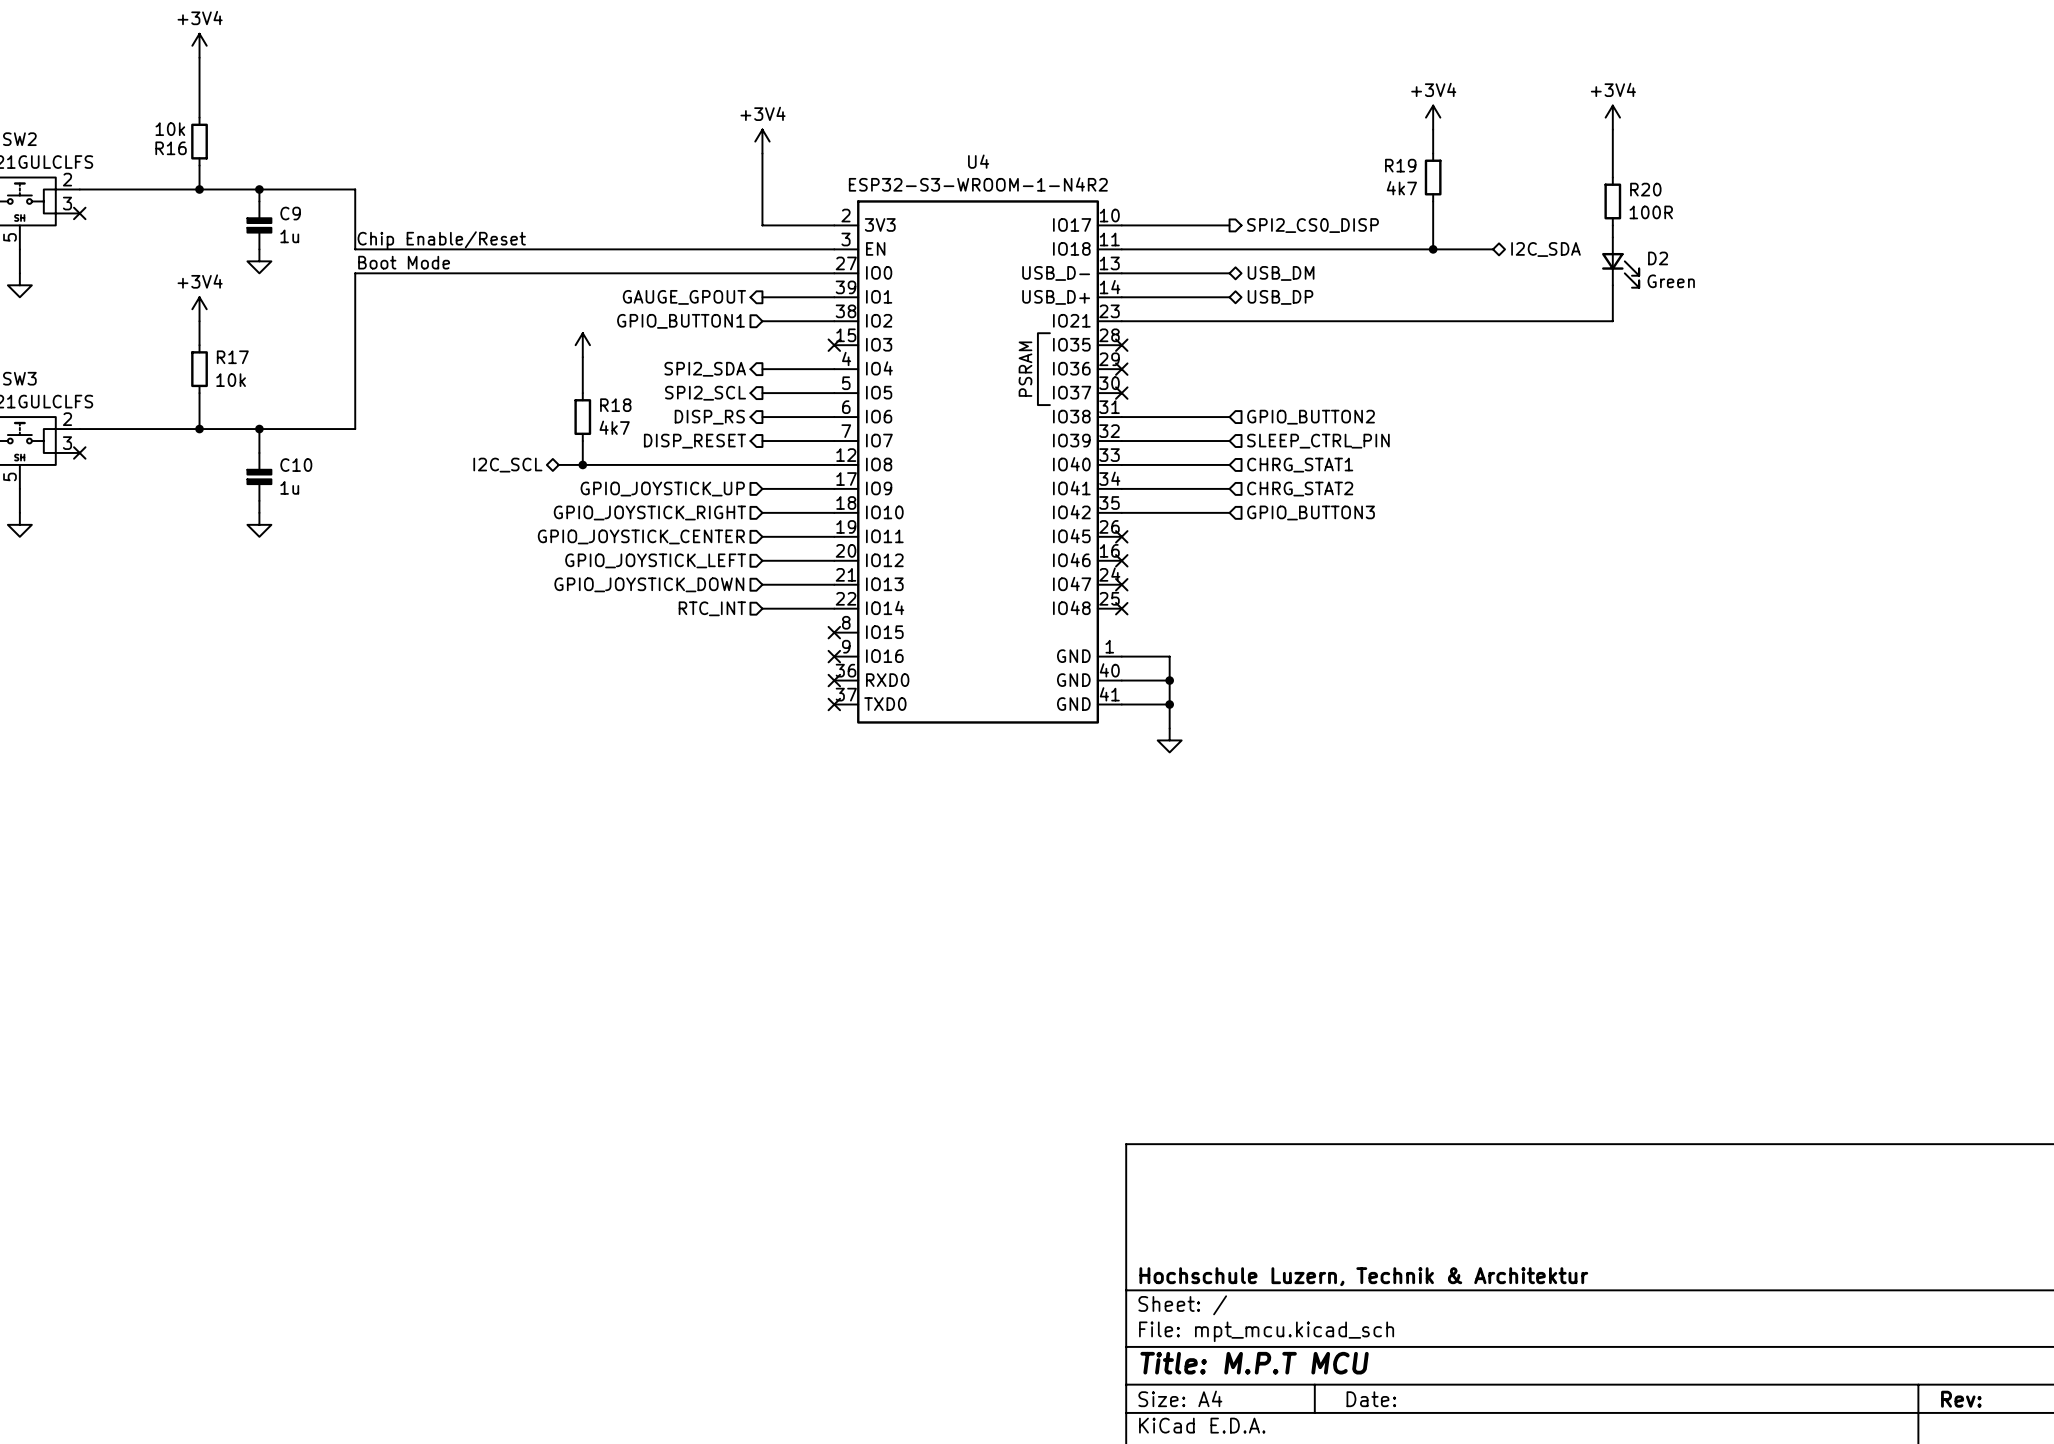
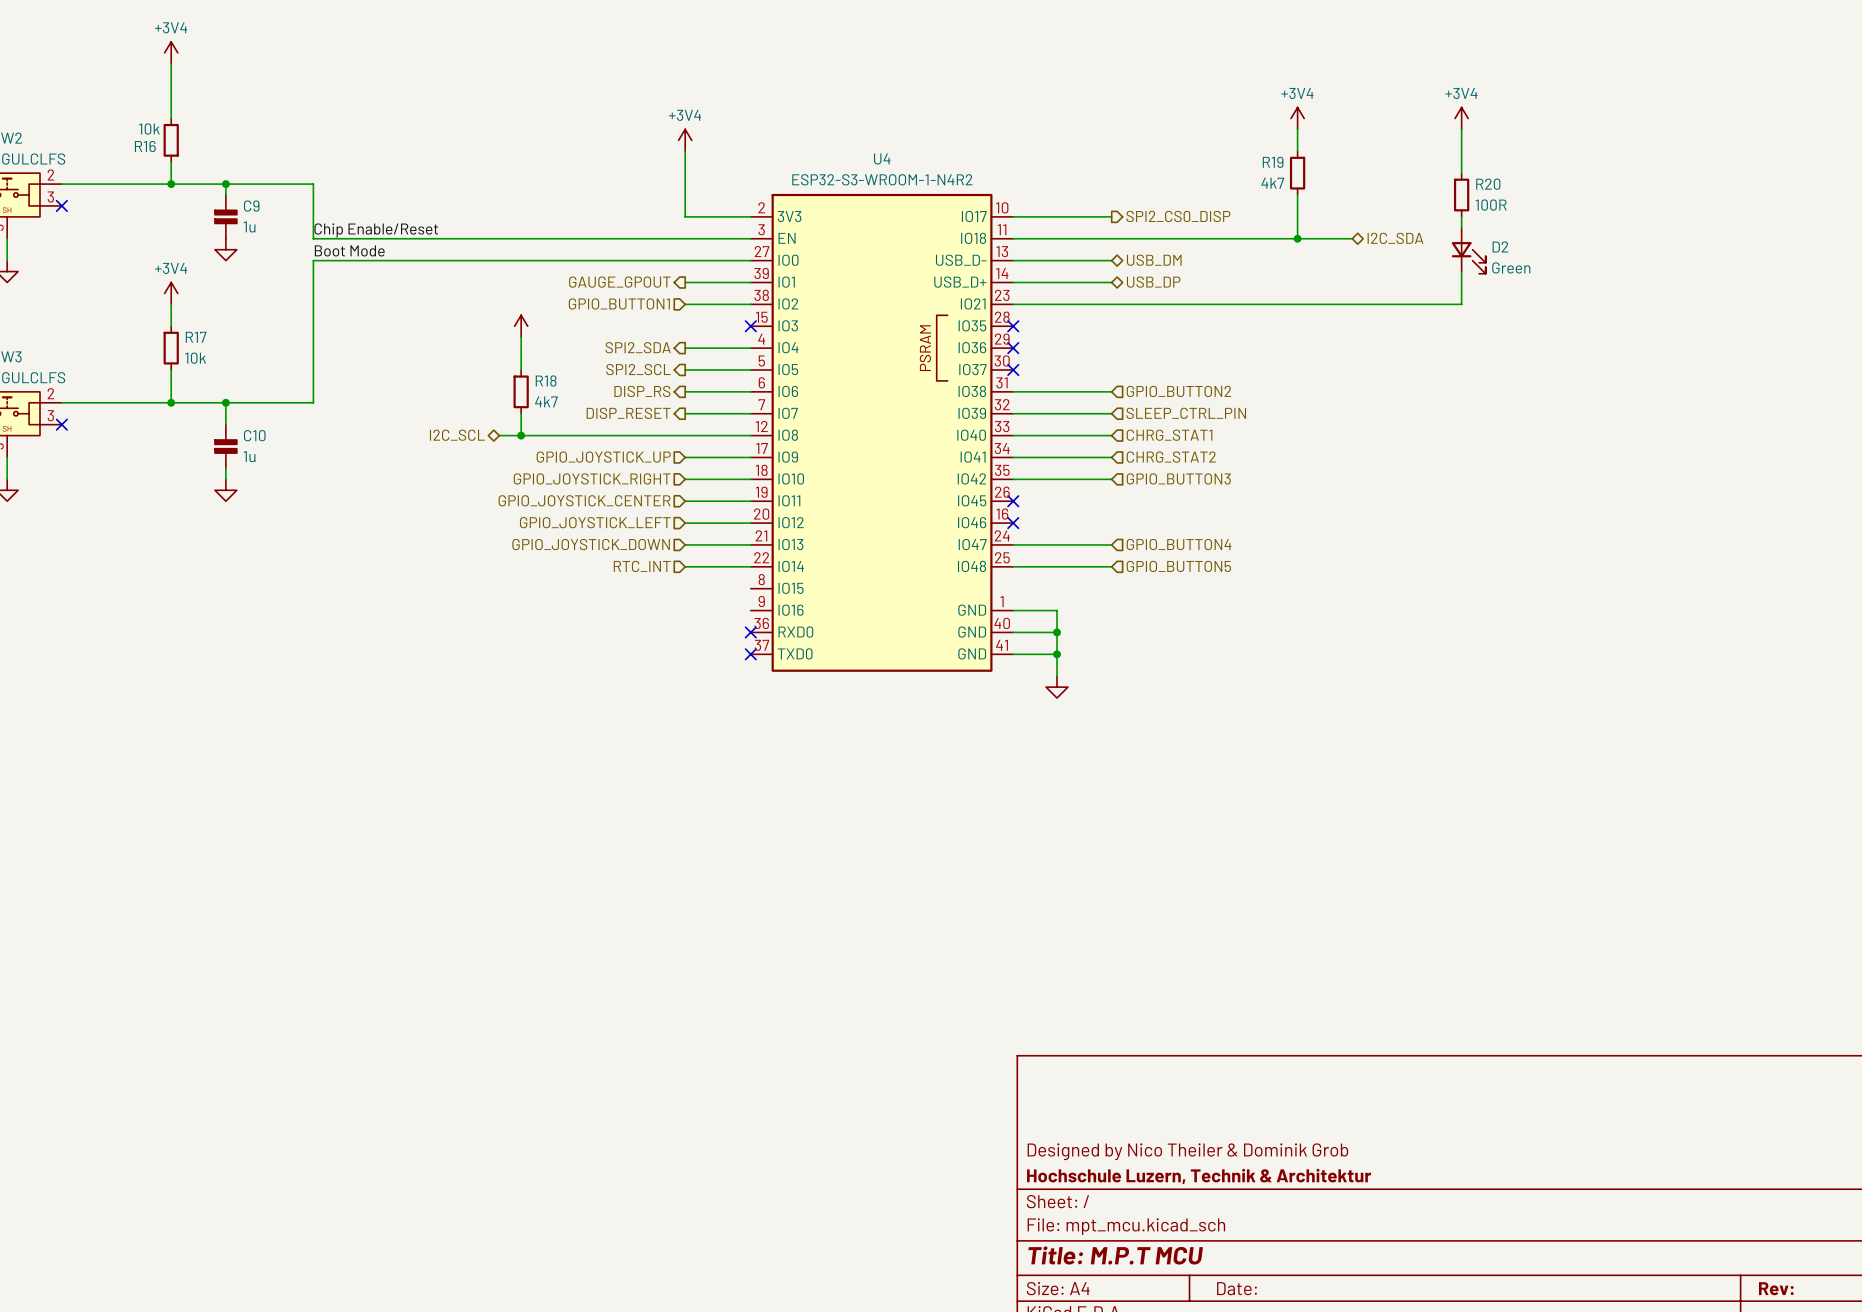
wire: none -> (1013, 544) (1111, 544)
no-connect mark: (1121, 584) -> none
hierarchical label: none -> GPIO_BUTTON4 (1179, 544)
wire: none -> (1013, 566) (1111, 566)
no-connect mark: (1121, 608) -> none
hierarchical label: none -> GPIO_BUTTON5 (1178, 566)
no-connect mark: (834, 632) -> none
no-connect mark: (834, 656) -> none
title block: none -> Designed by Nico Theiler & Dominik Grob (1187, 1151)

